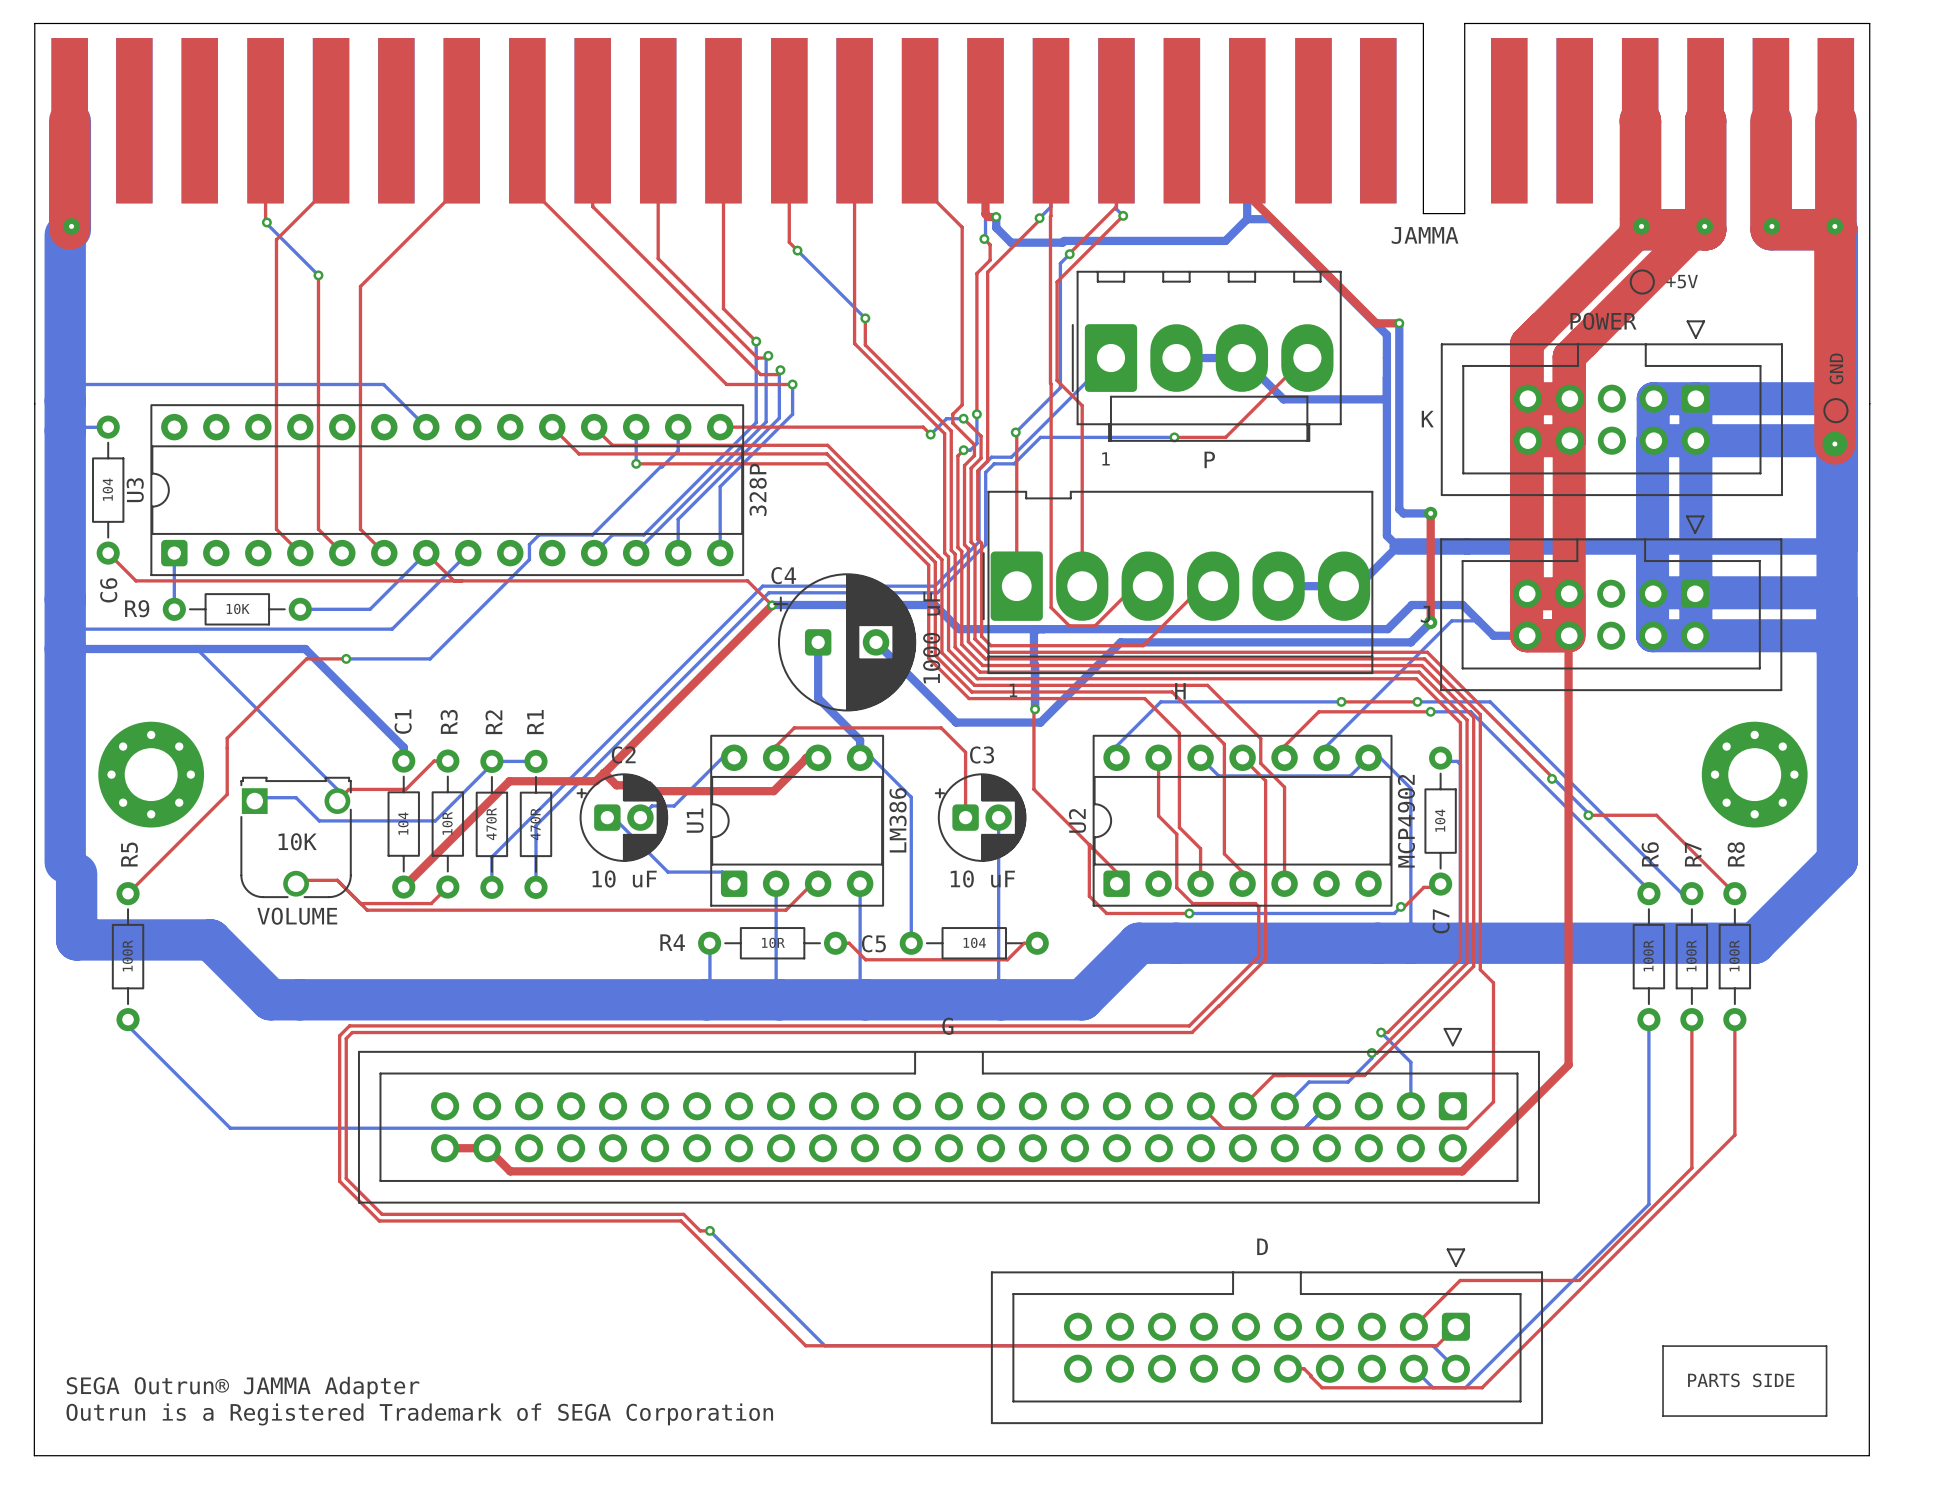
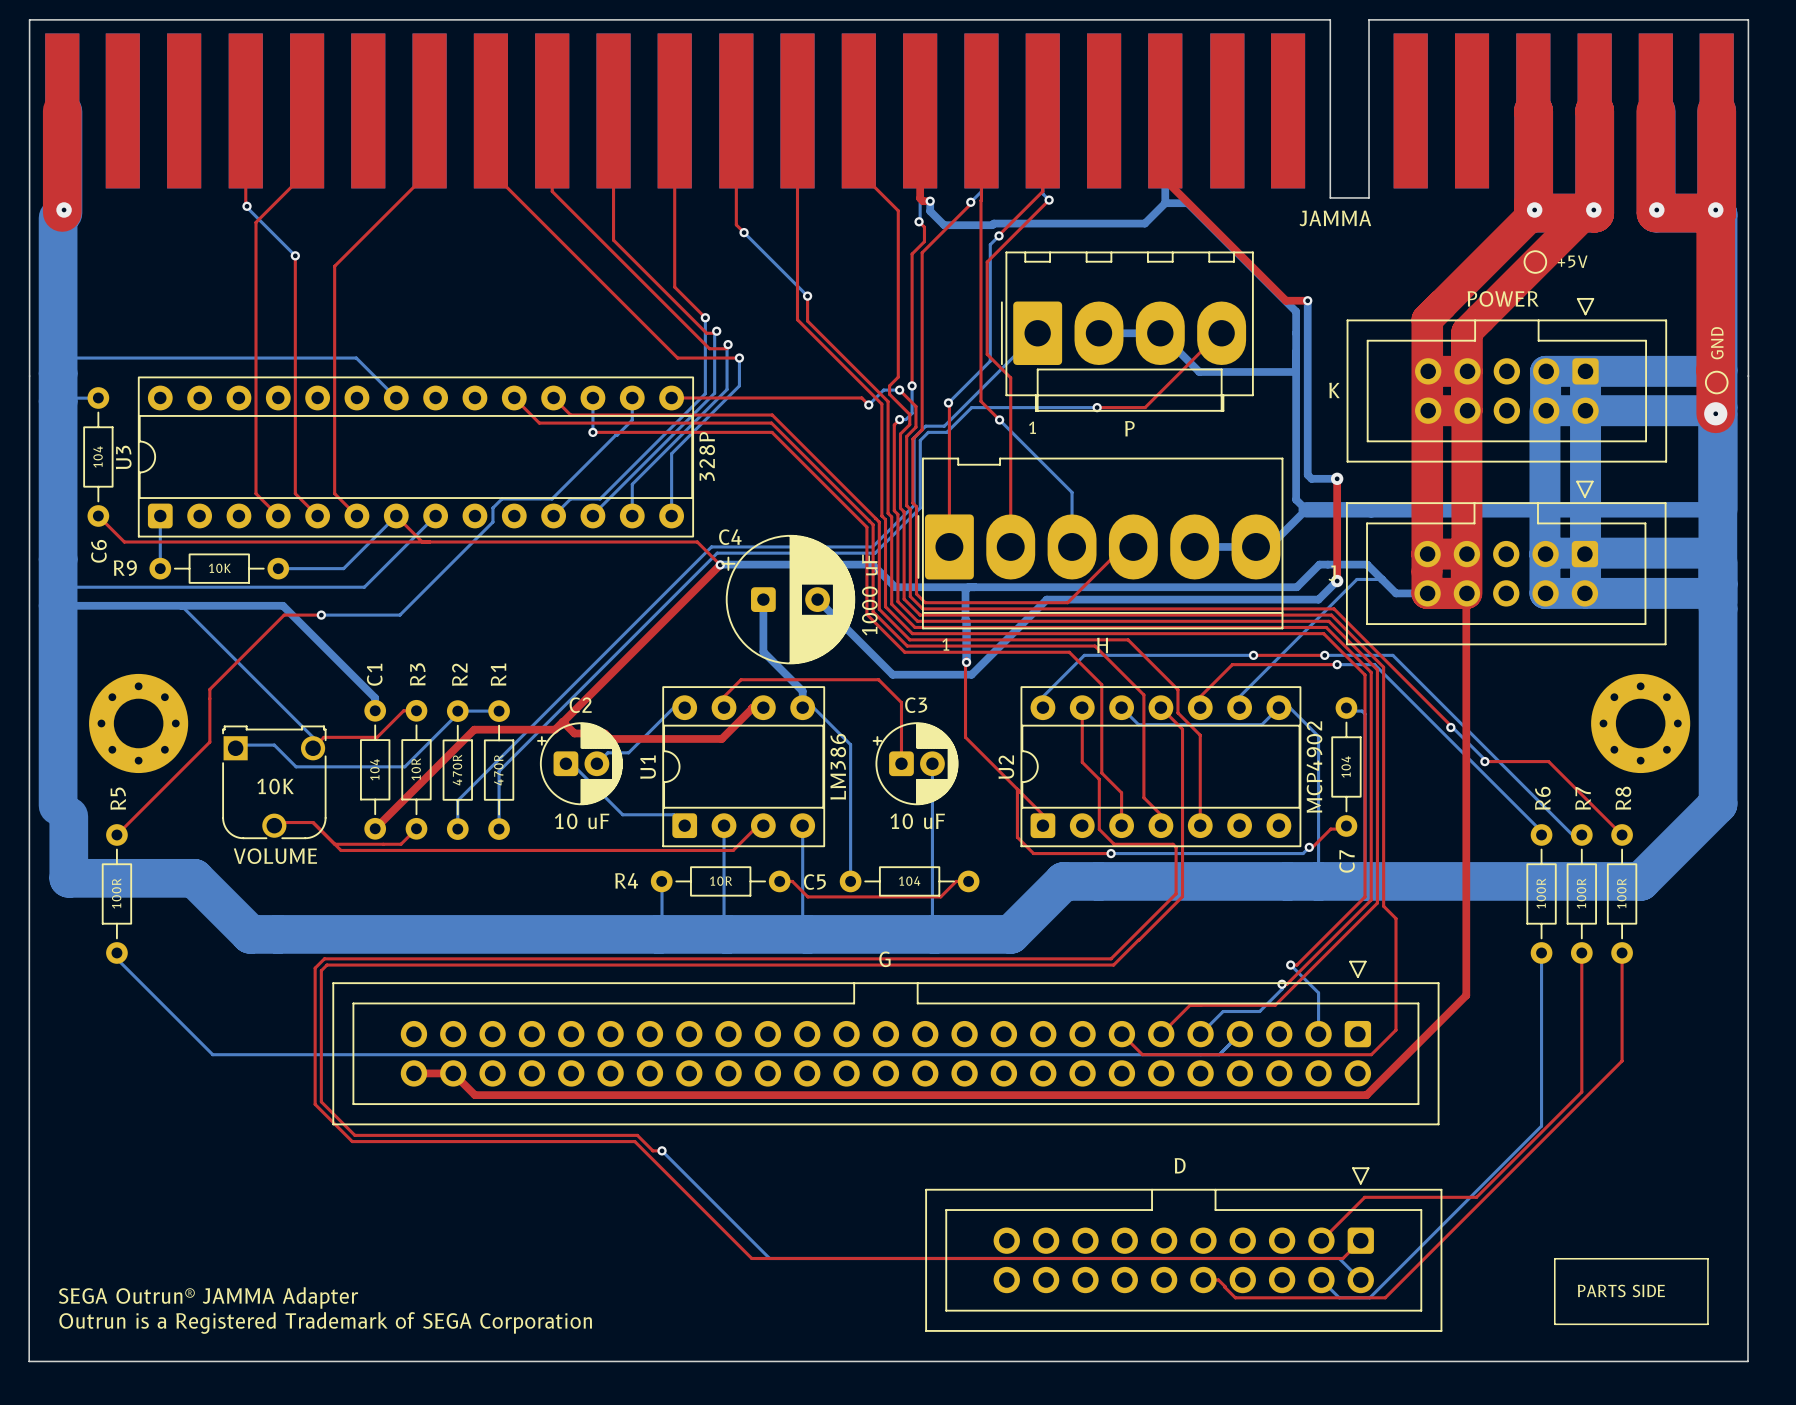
top track: (1050, 383) (1051, 607) (1069, 625) (1095, 625) (1134, 586) (1147, 586) -> (981, 356) (981, 401) (999, 419)
bottom track: none -> (999, 419) (1072, 492) (1072, 546)
via: none -> (999, 419)

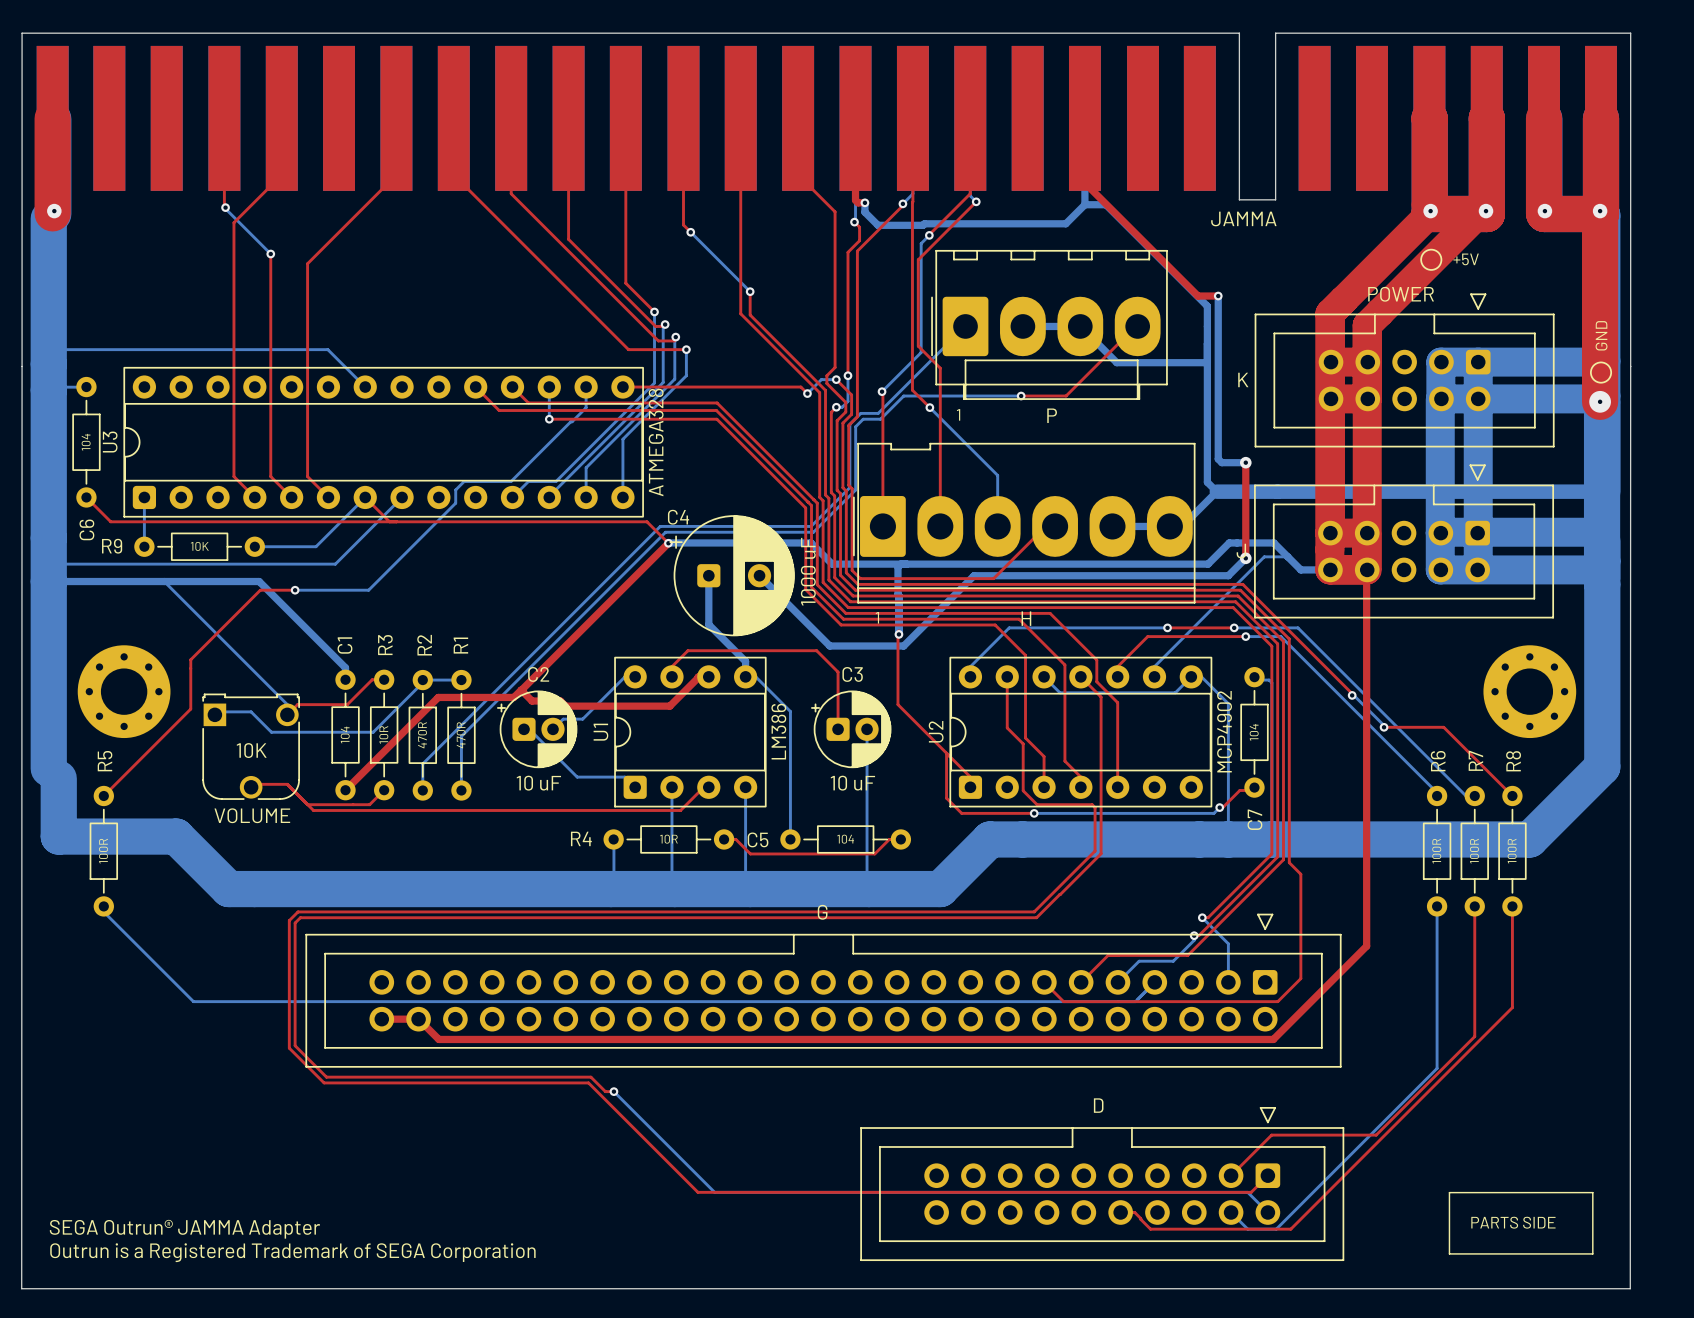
U3 value: 328P (707, 456) -> ATMEGA328 (656, 442)

